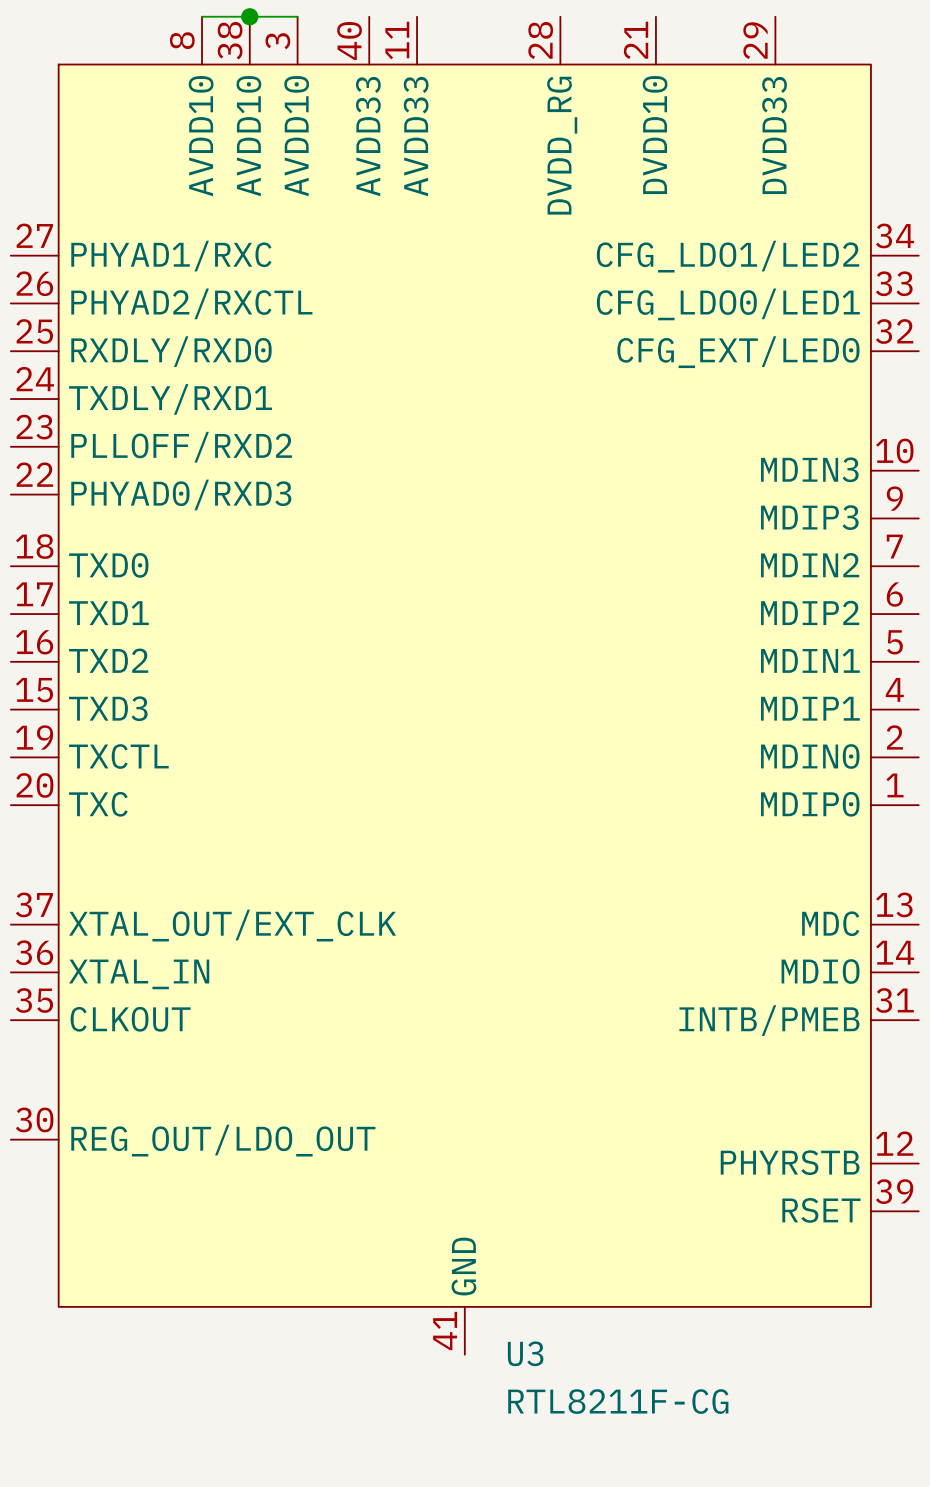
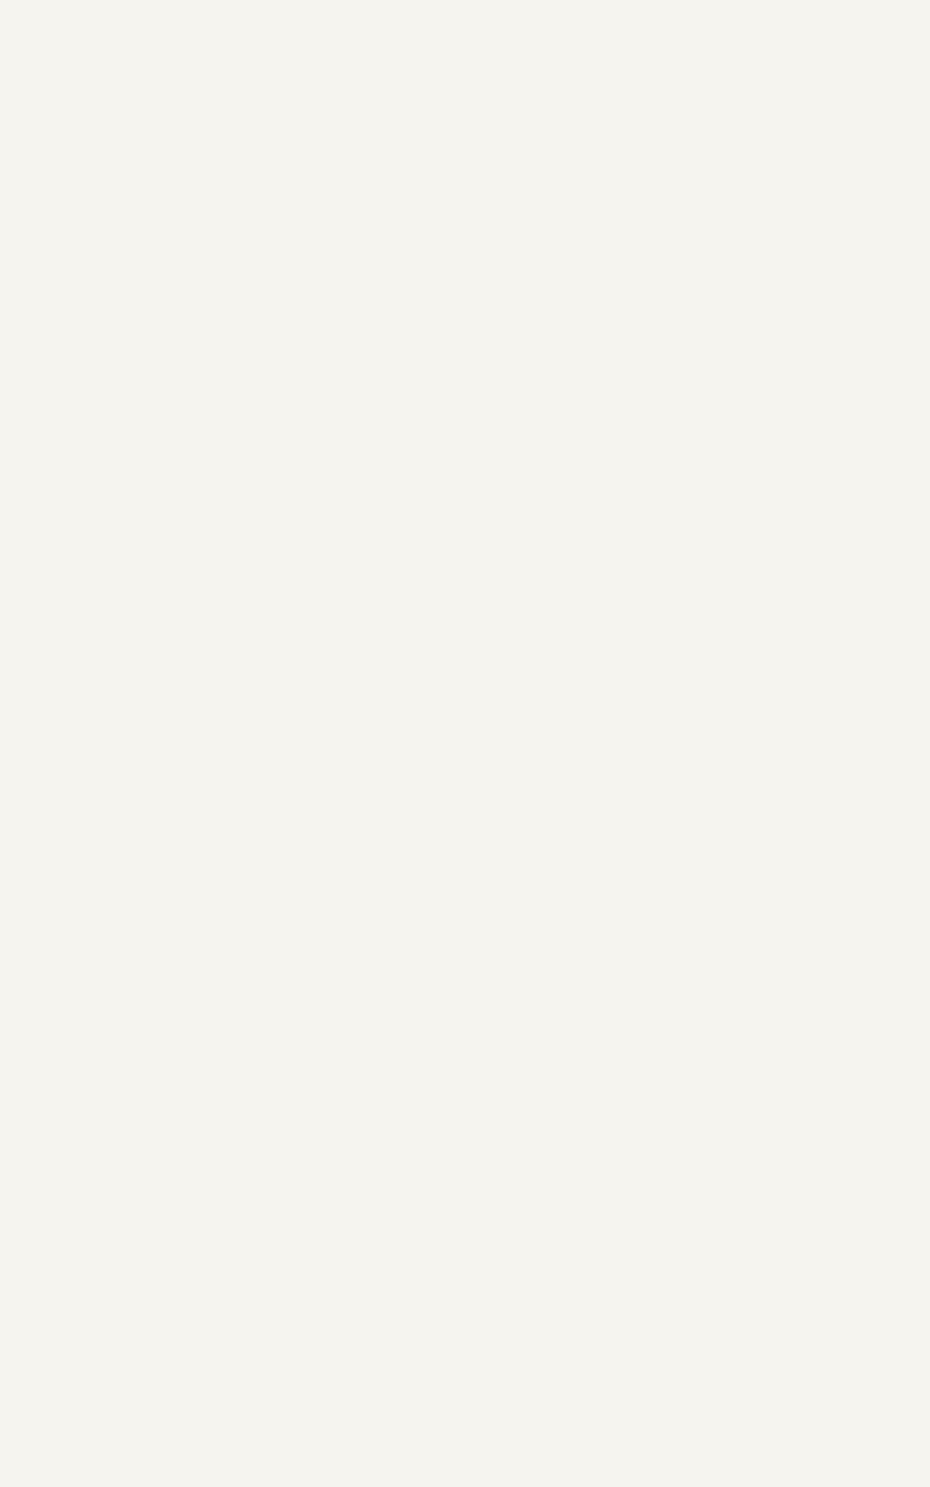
wire: (202, 16) (297, 16) -> none
junction: (249, 16) -> none
U3: RTL8211F-CG (464, 685) -> none

